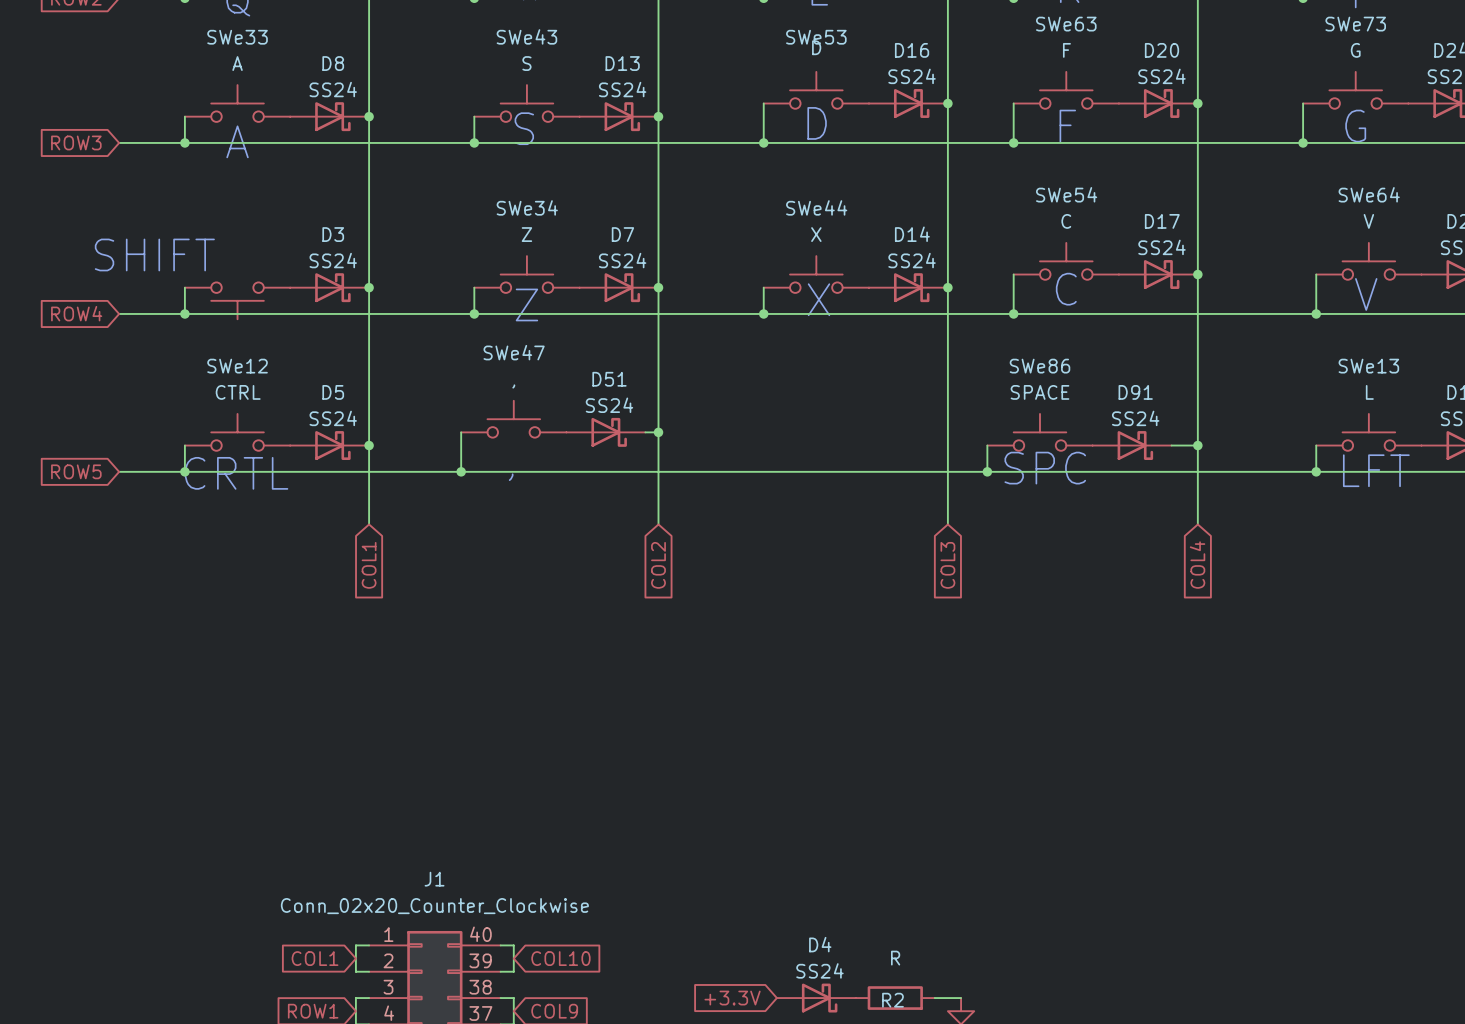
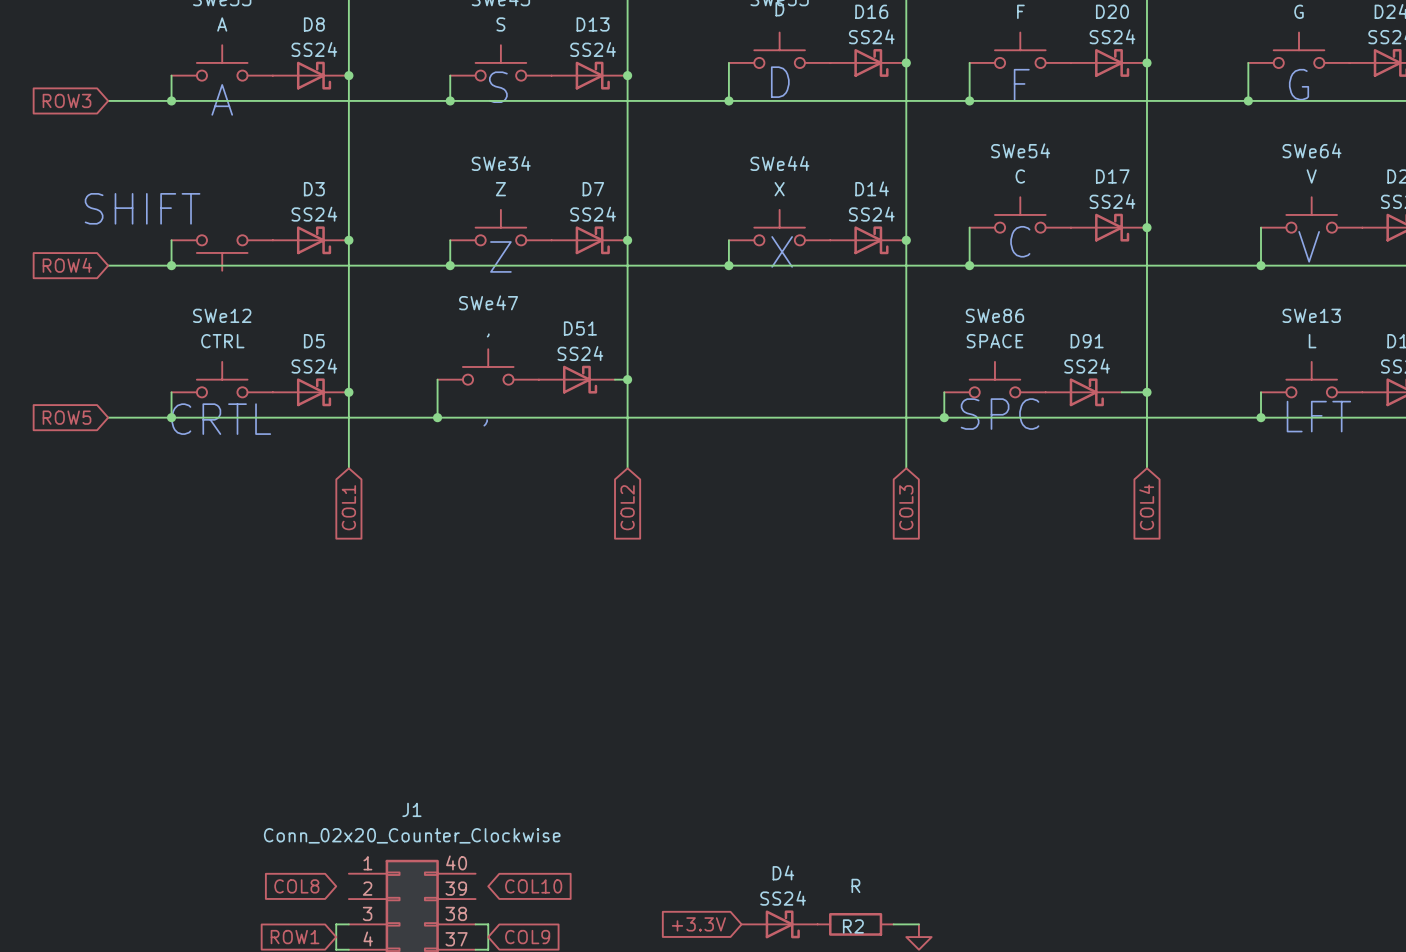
wire: (369, 945) (355, 945) (355, 971) (369, 971) -> none
wire: (500, 945) (513, 945) (513, 971) (500, 971) -> none
global label: COL1 (315, 958) -> COL8 (296, 886)

